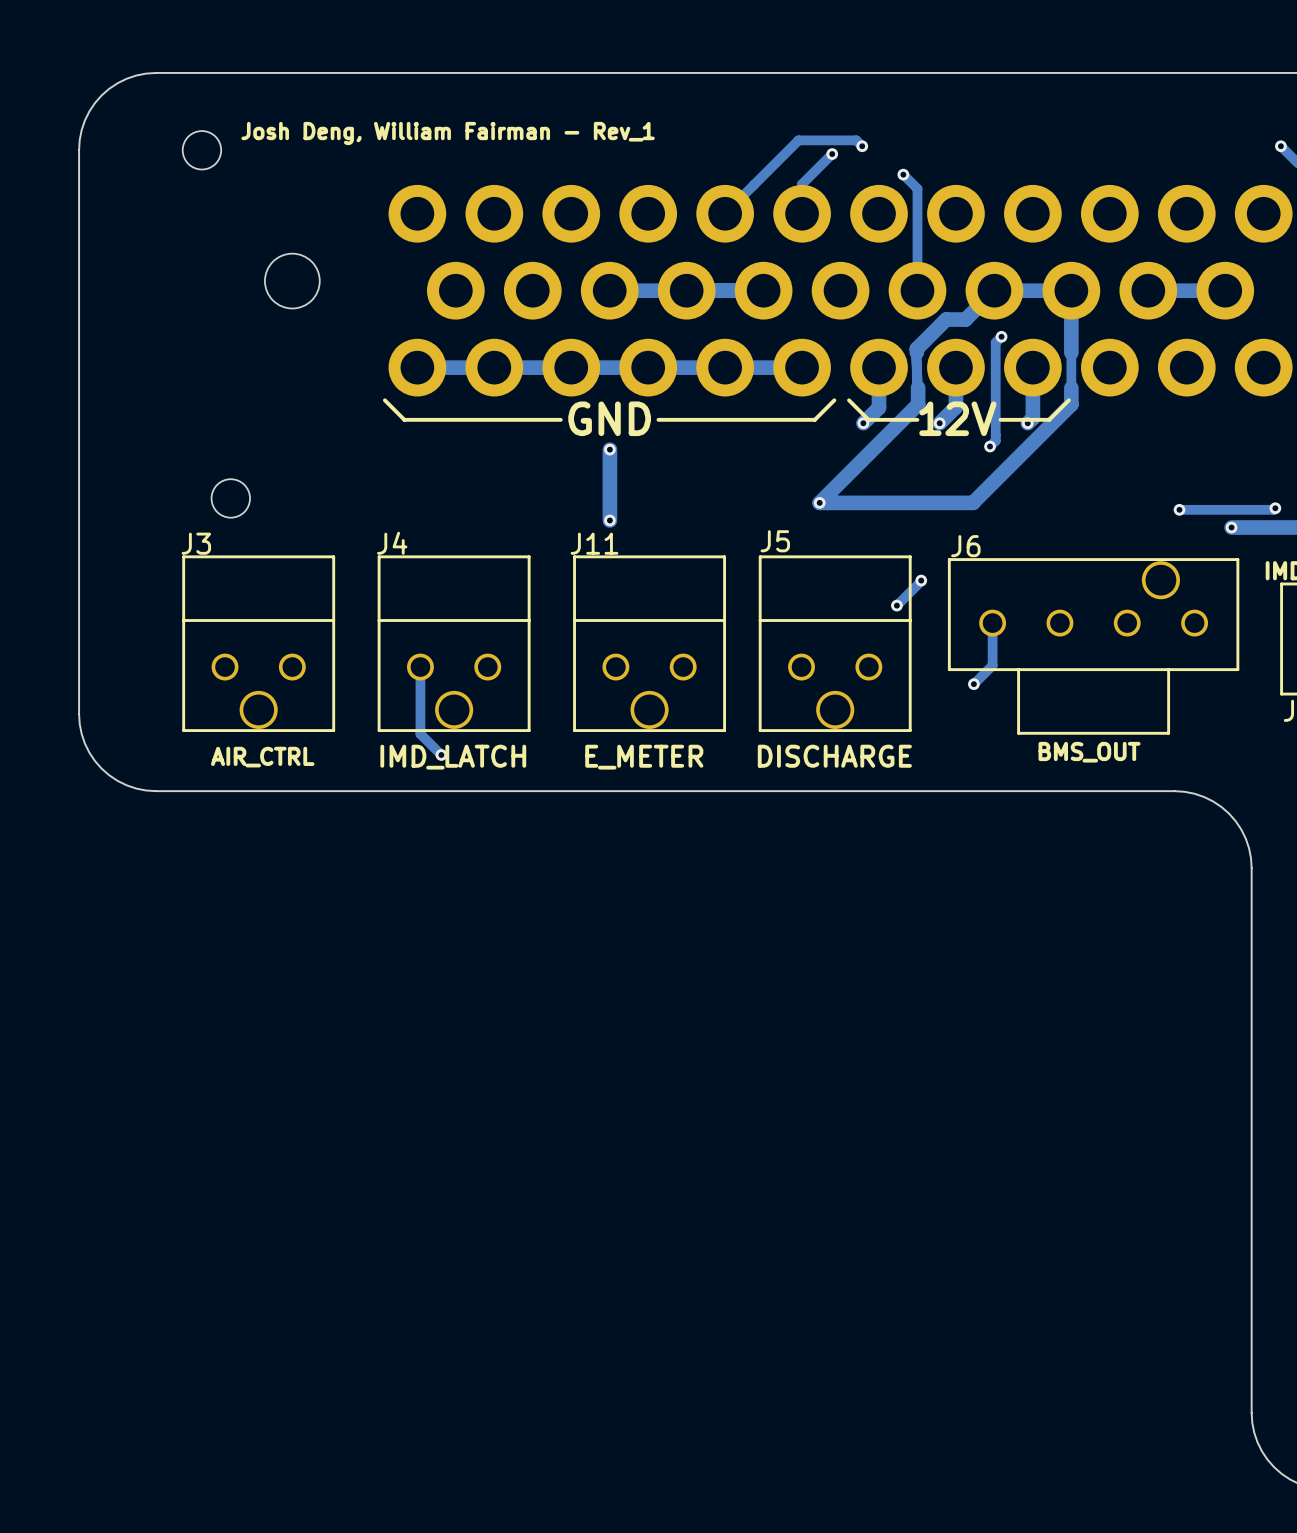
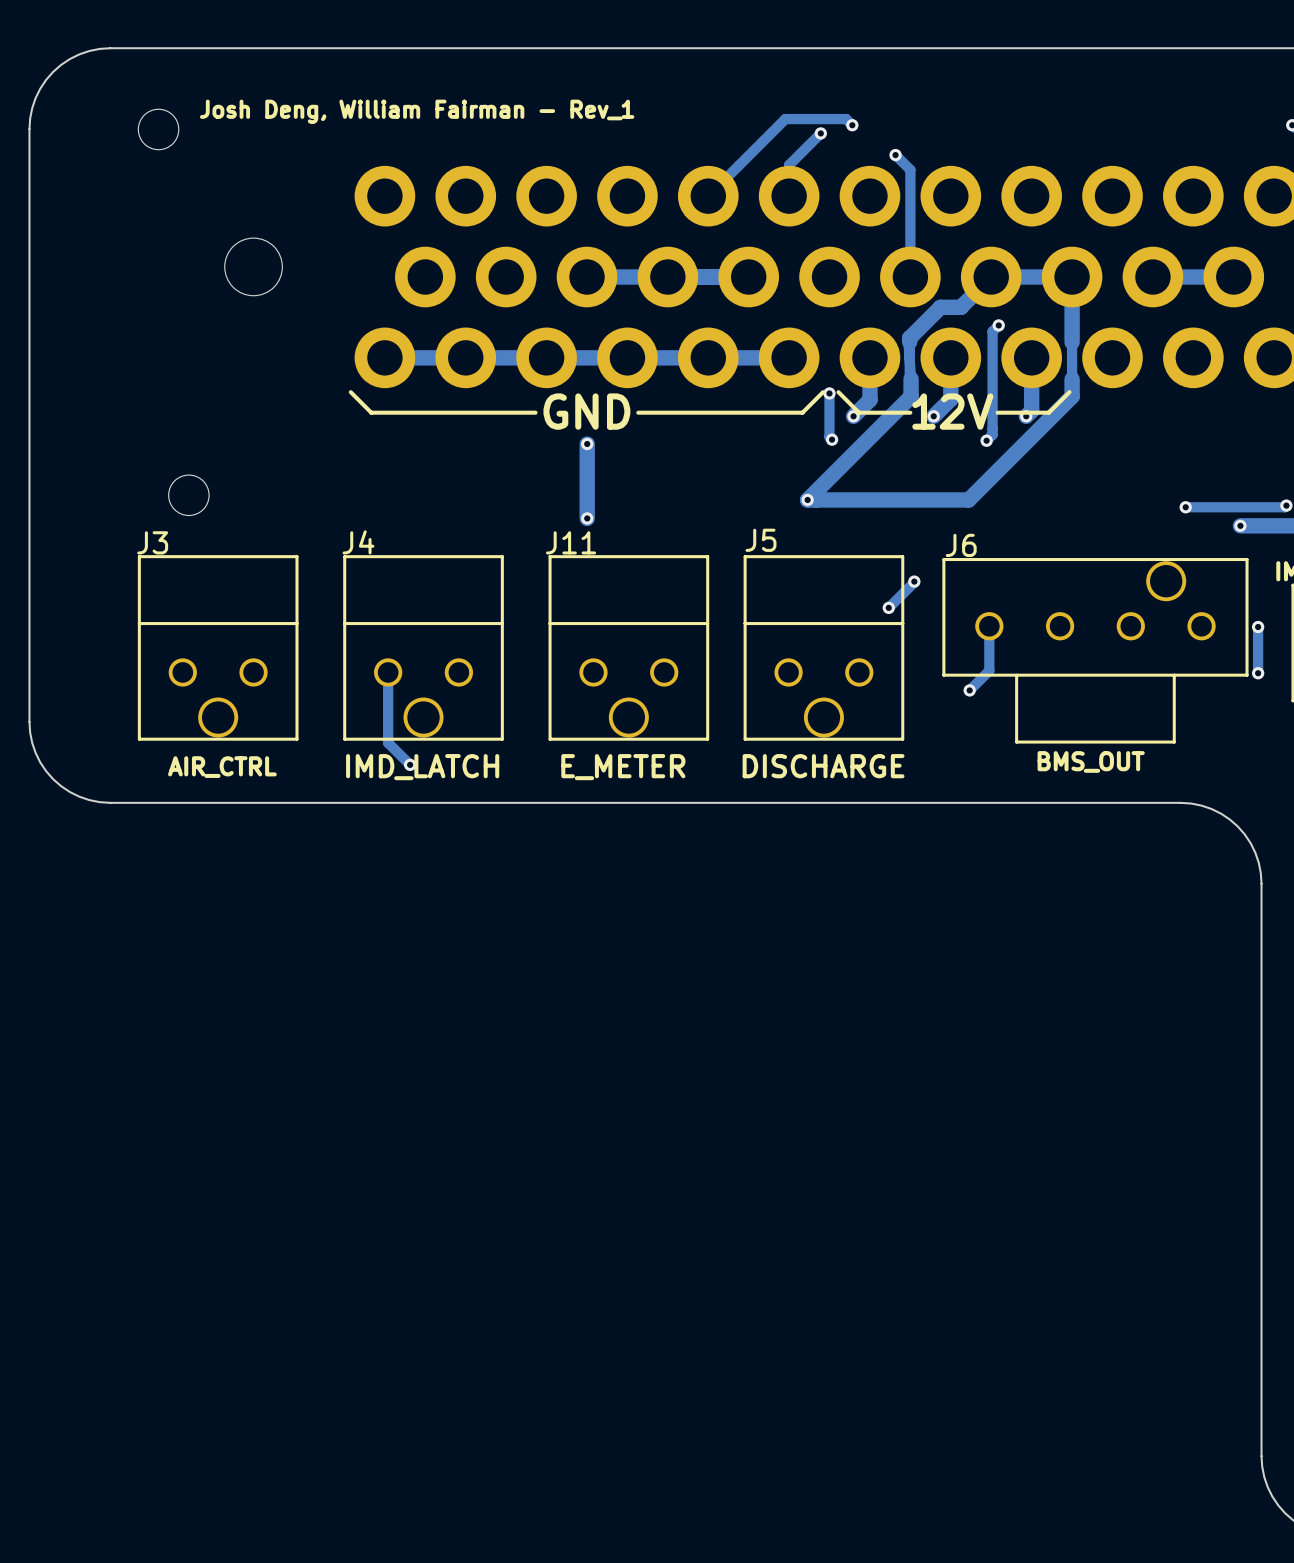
track: none -> (829, 393) (829, 437) (832, 439)
via: none -> (829, 393)
via: none -> (832, 439)
track: none -> (1258, 627) (1258, 673)
via: none -> (1258, 627)
via: none -> (1258, 673)

